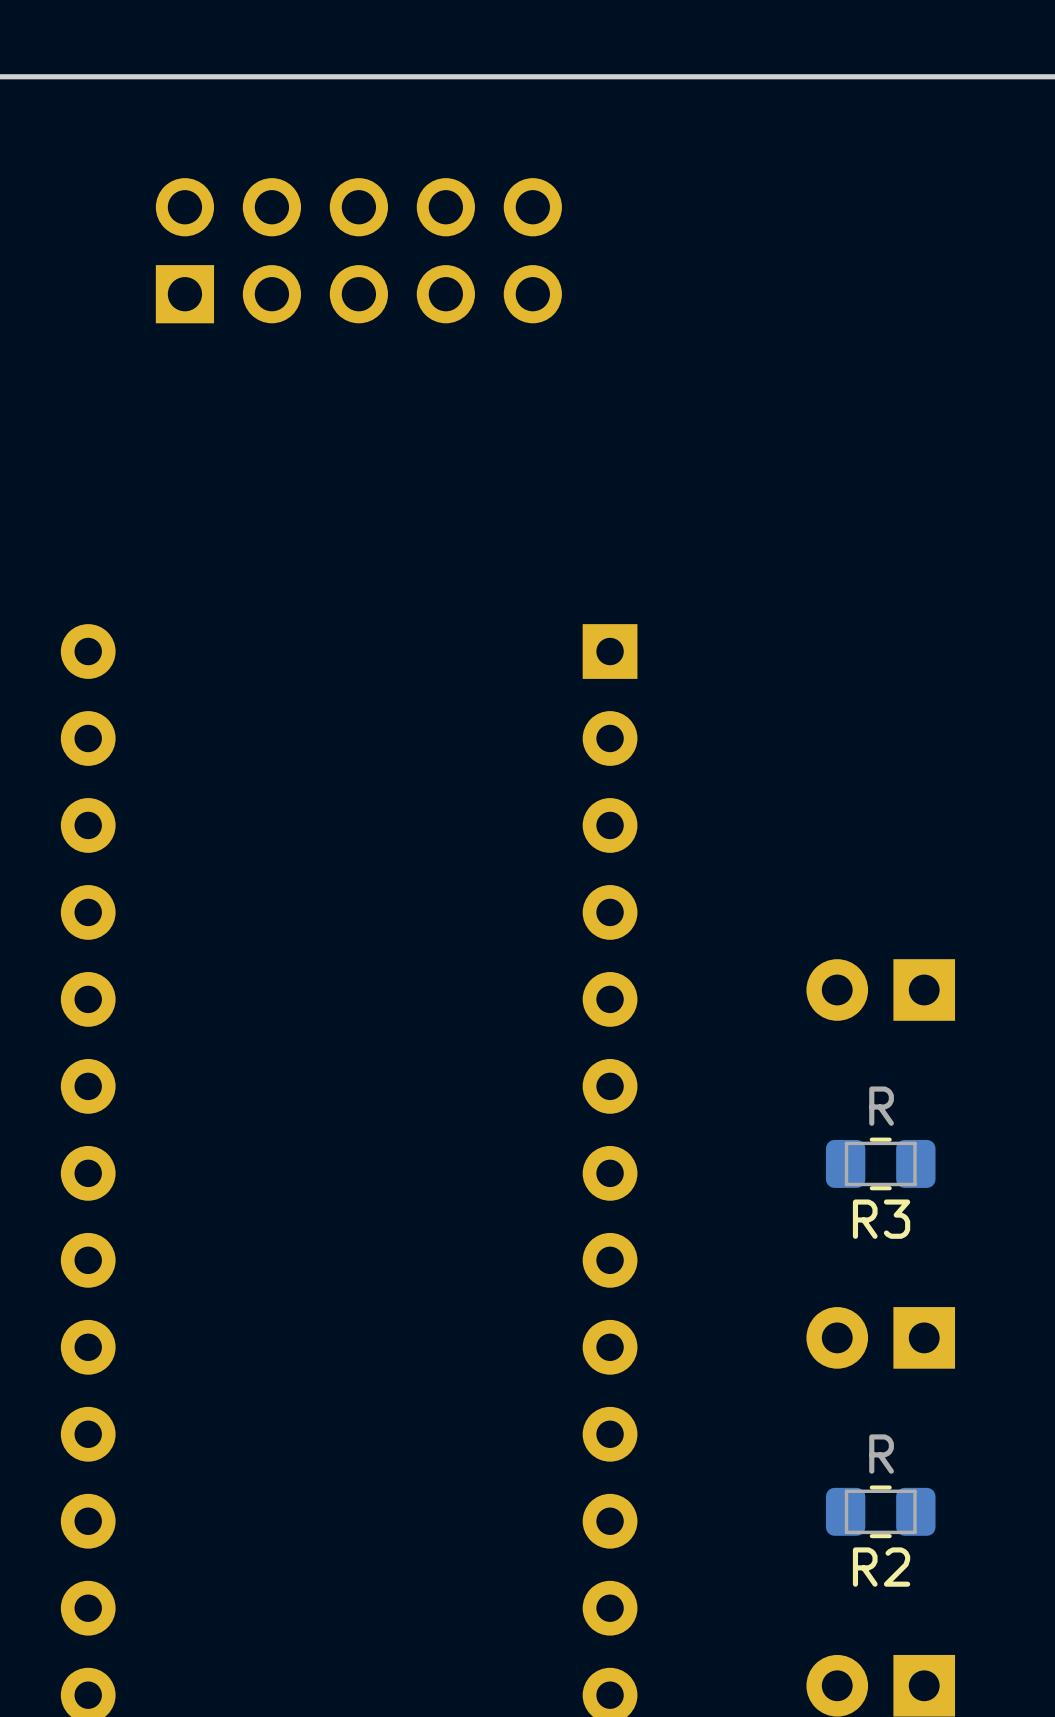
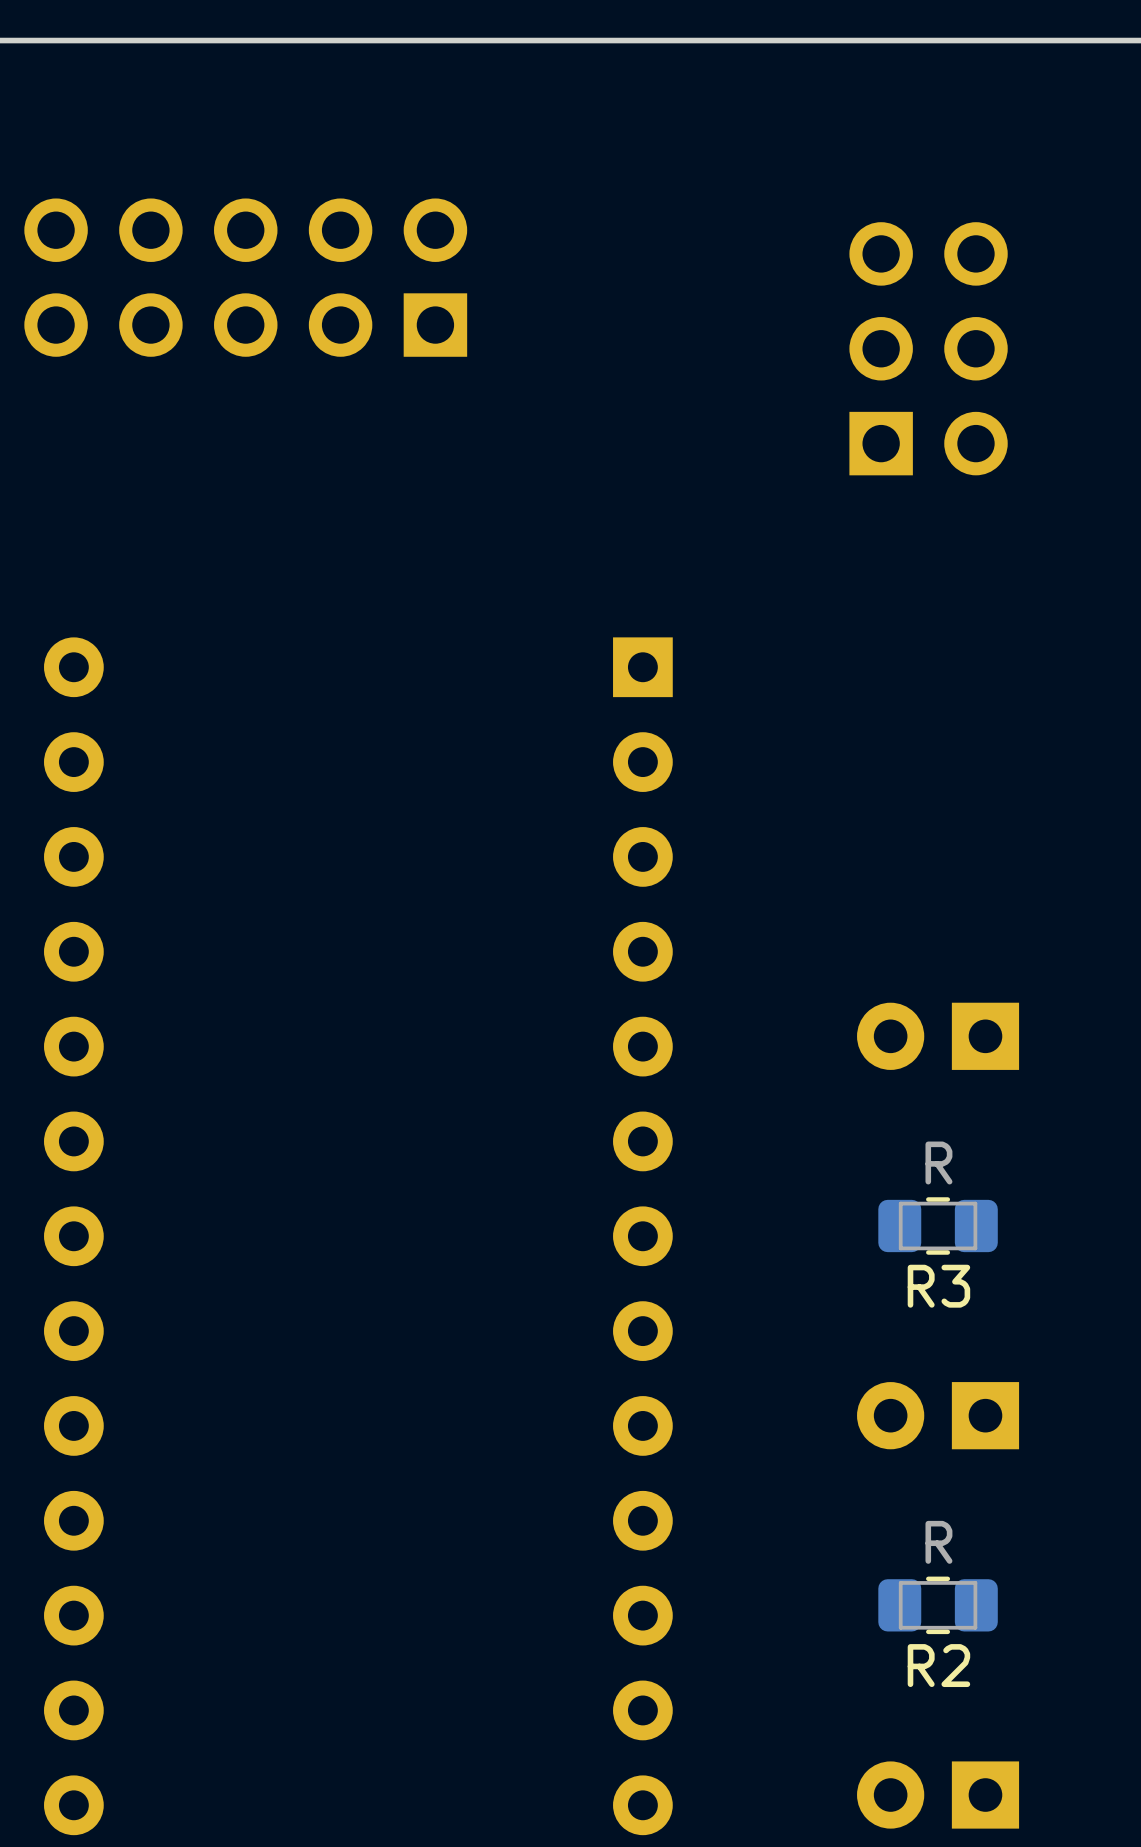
part: (358, 250) -> none
part: none -> (245, 277)
part: none -> (928, 348)

